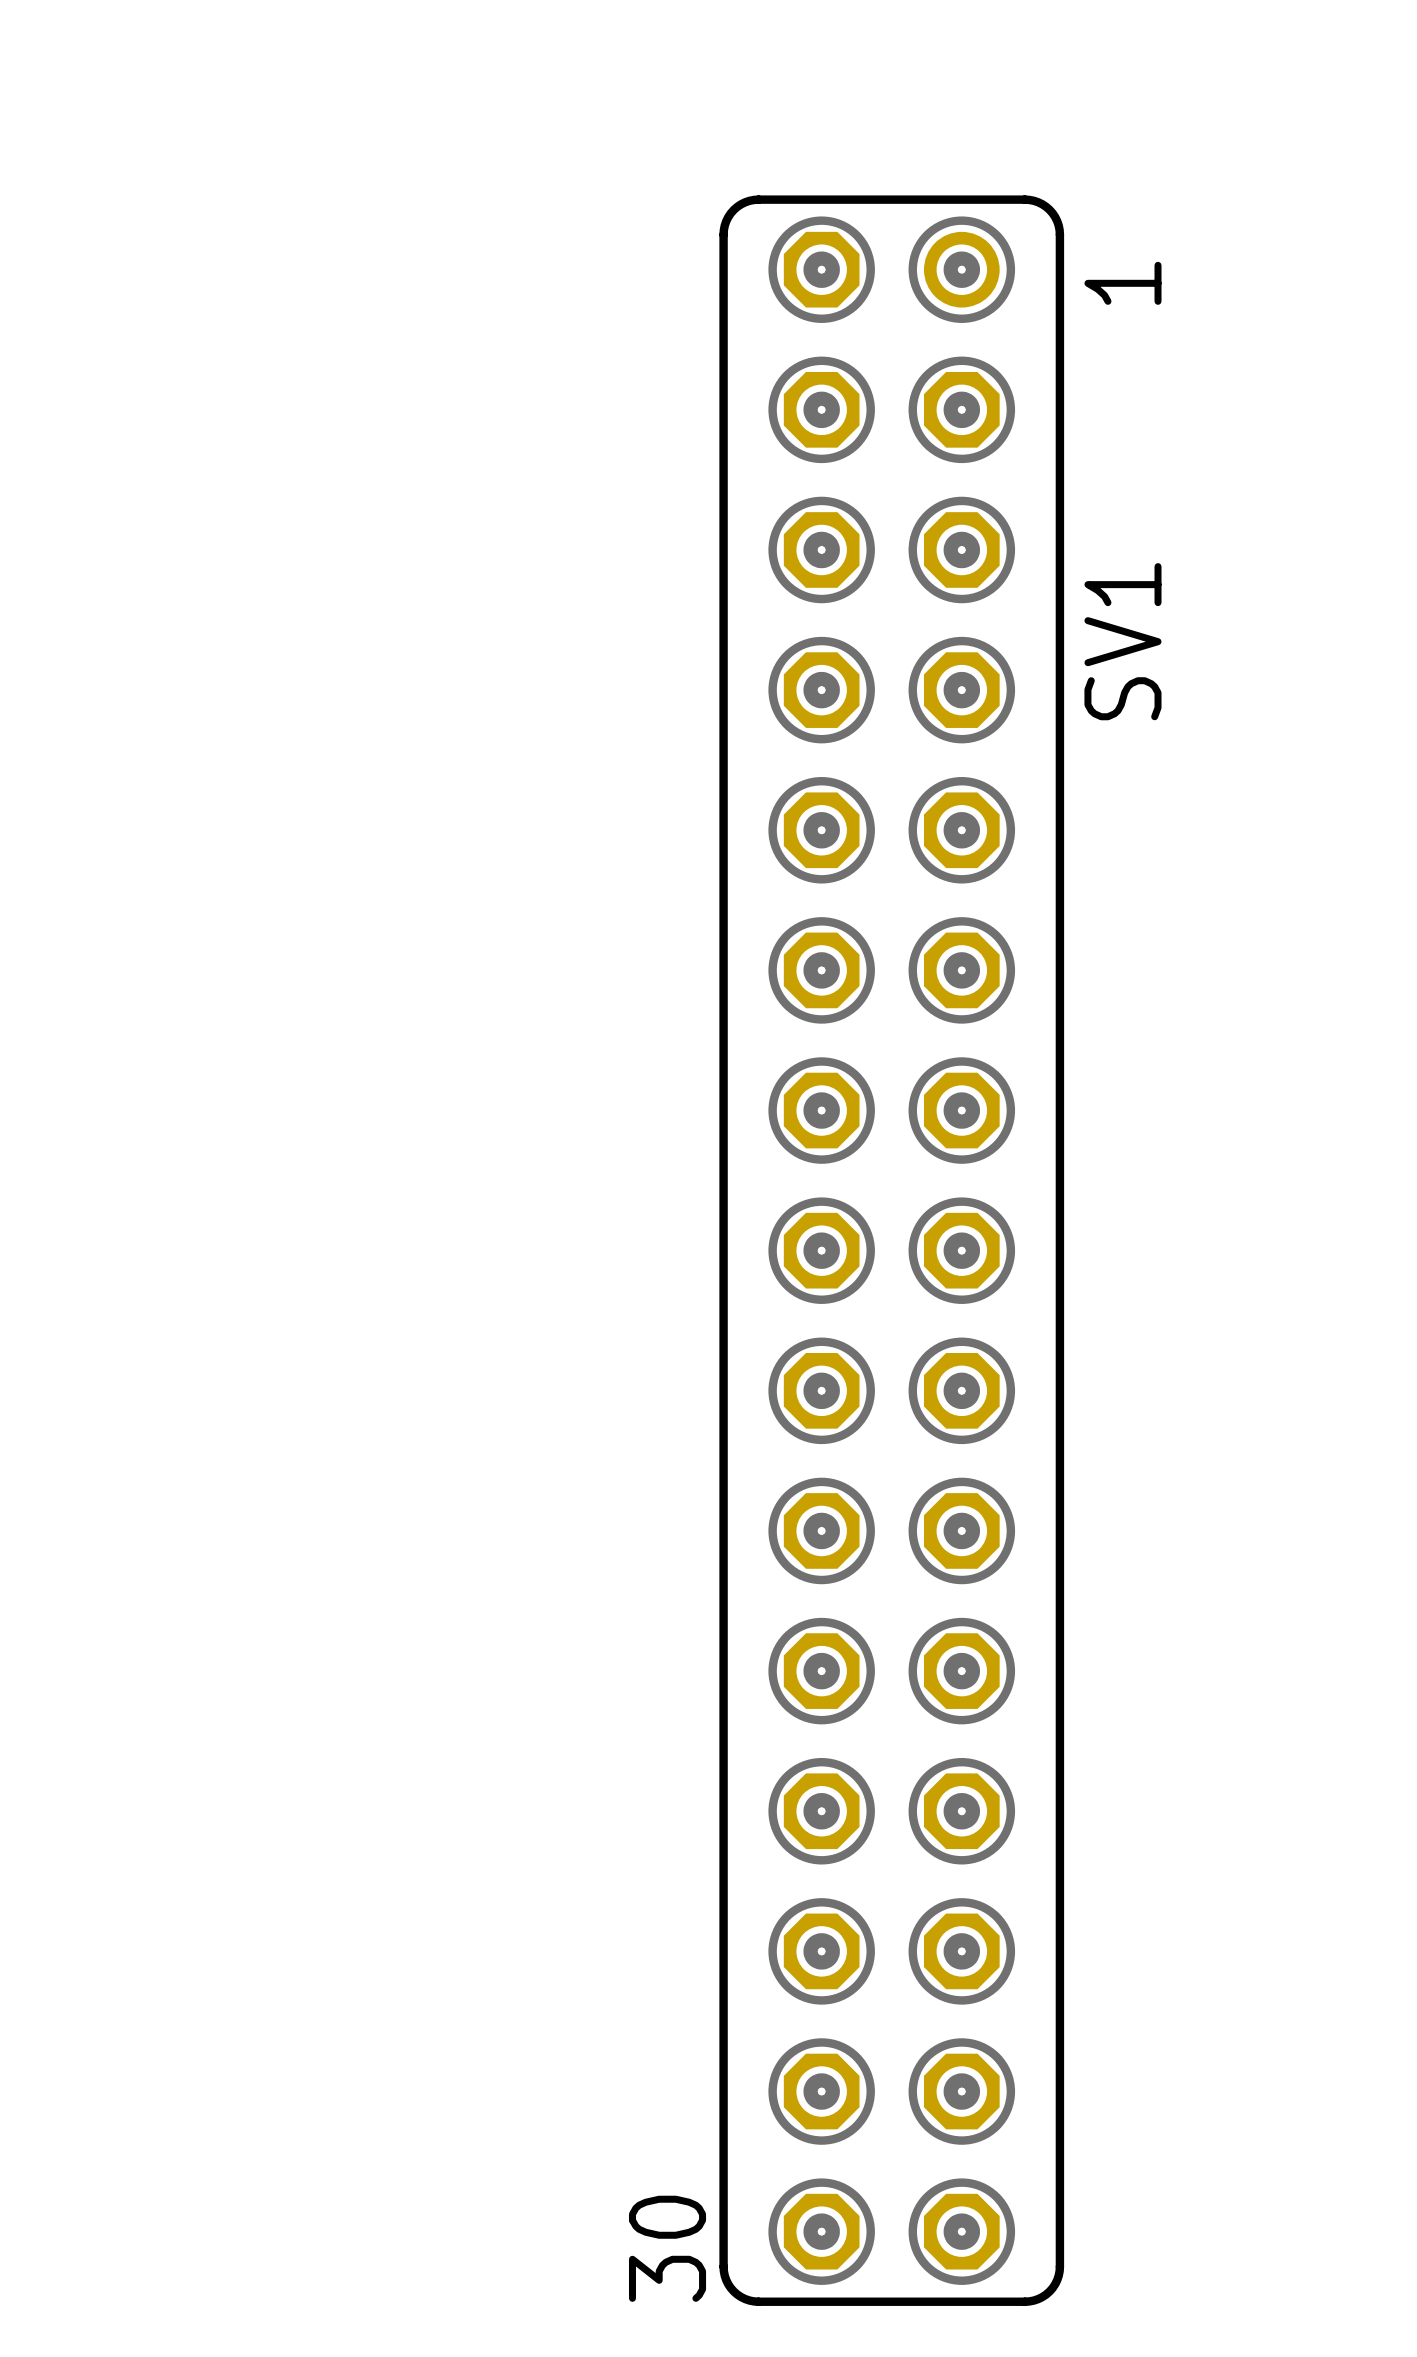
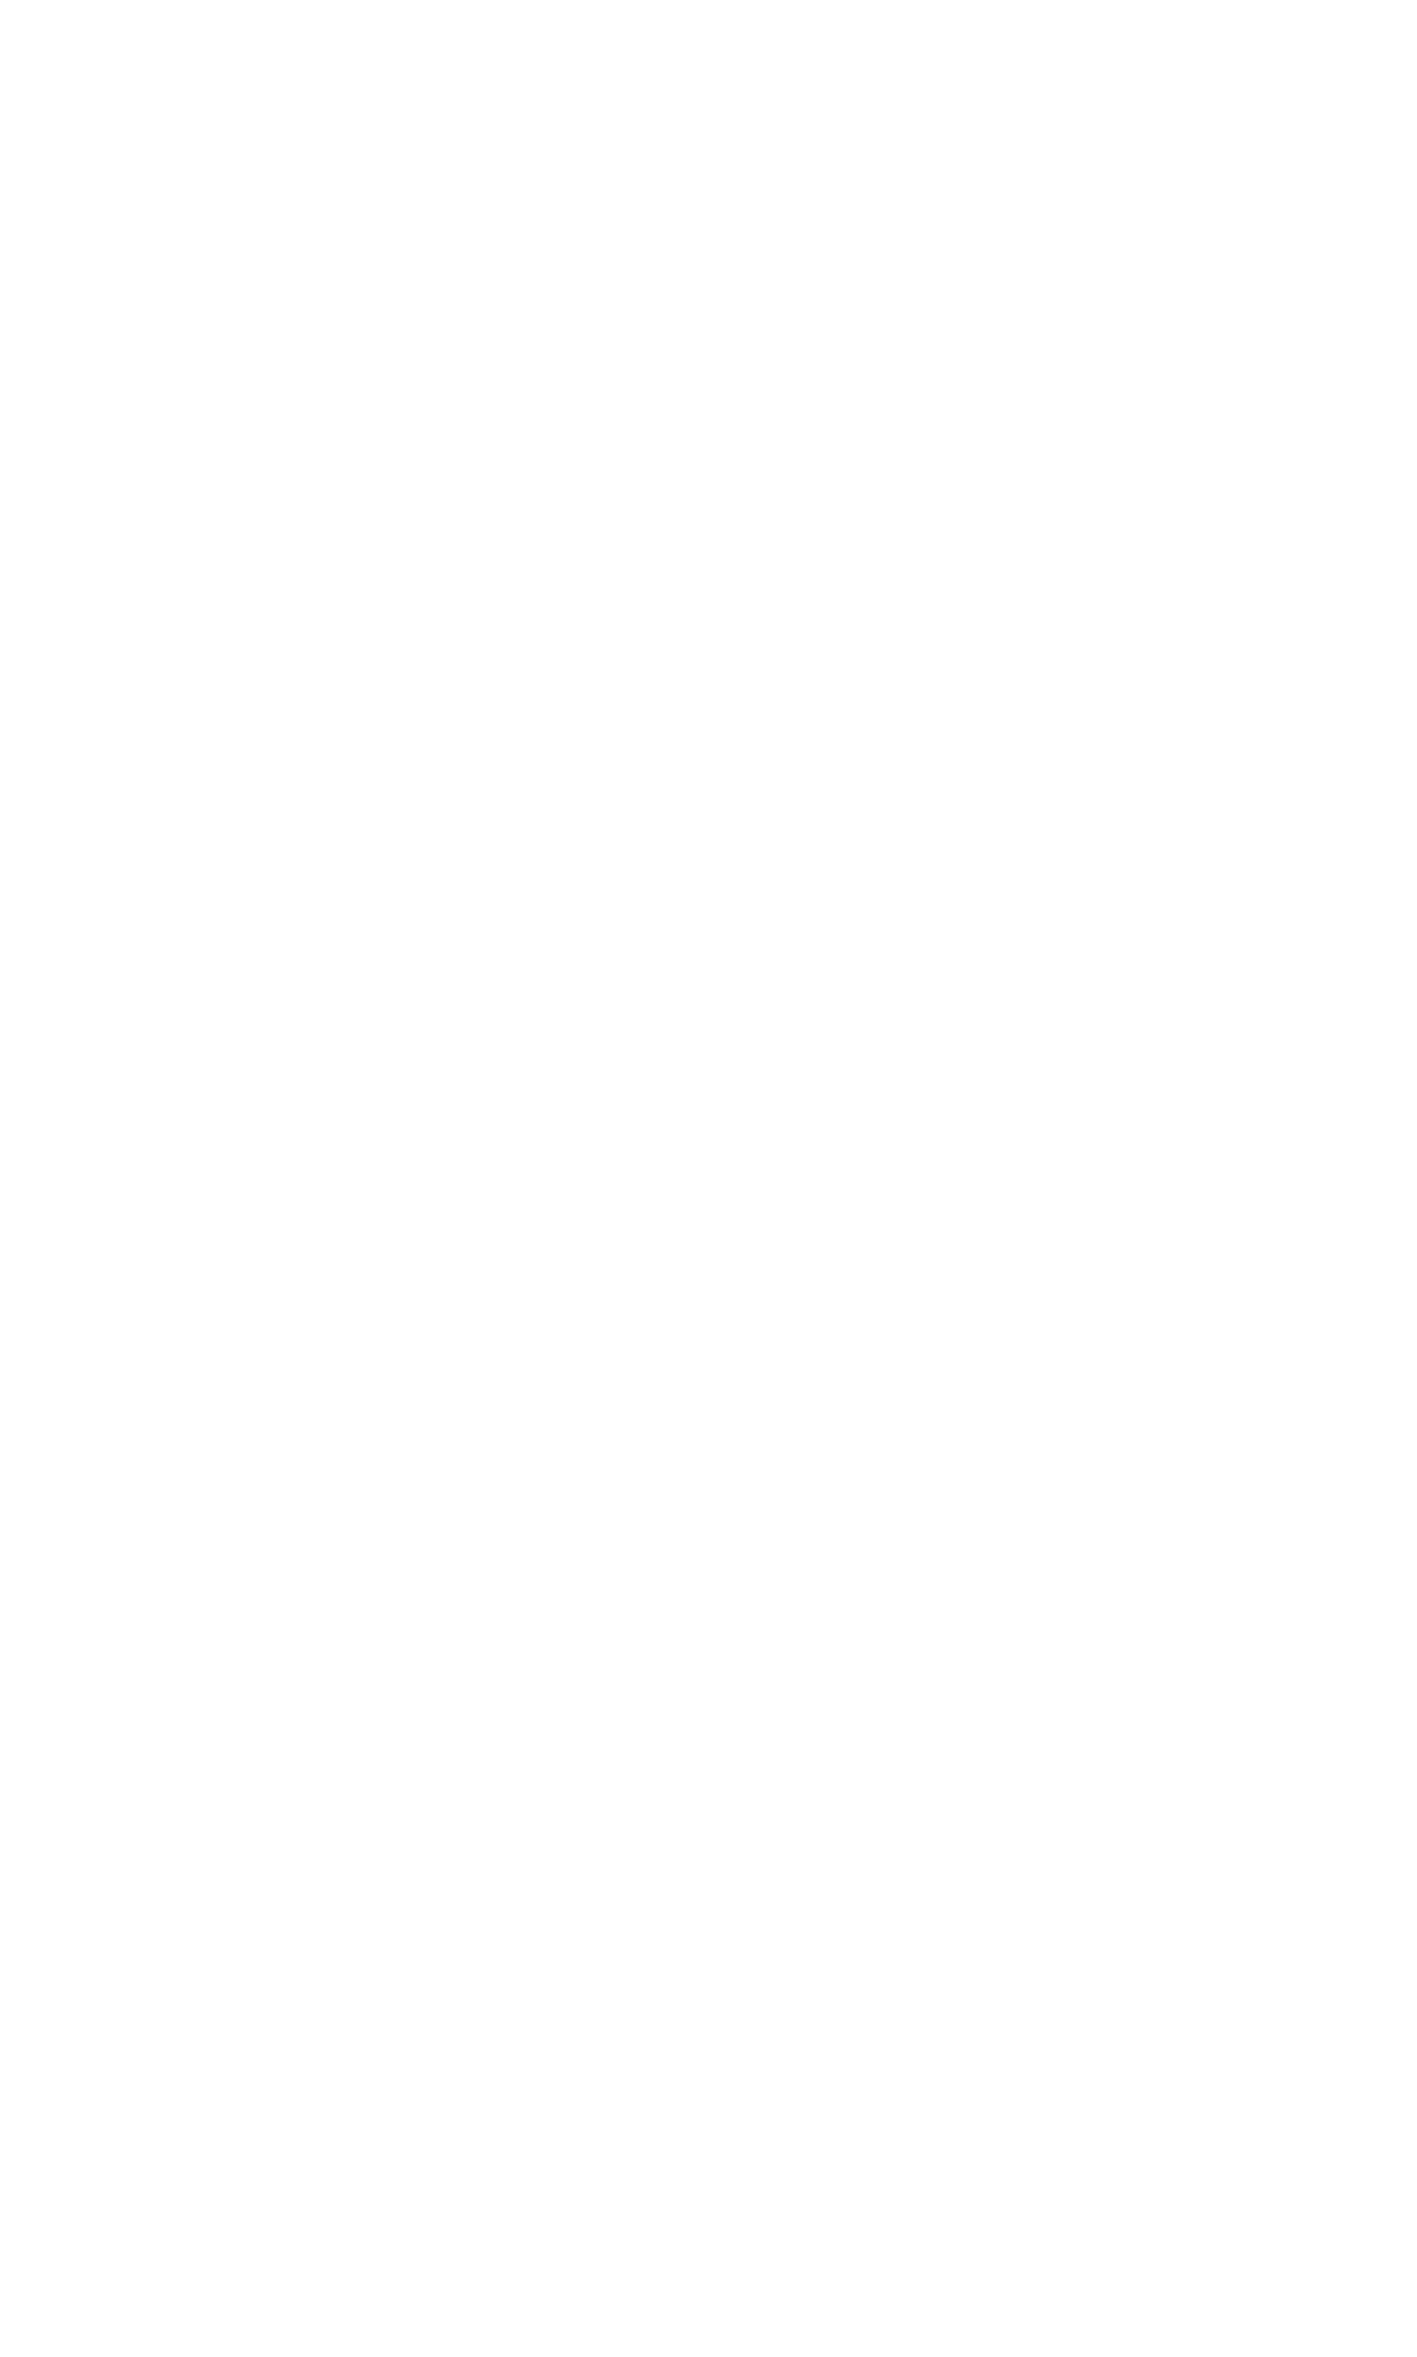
SV1: (891, 1250) -> none

